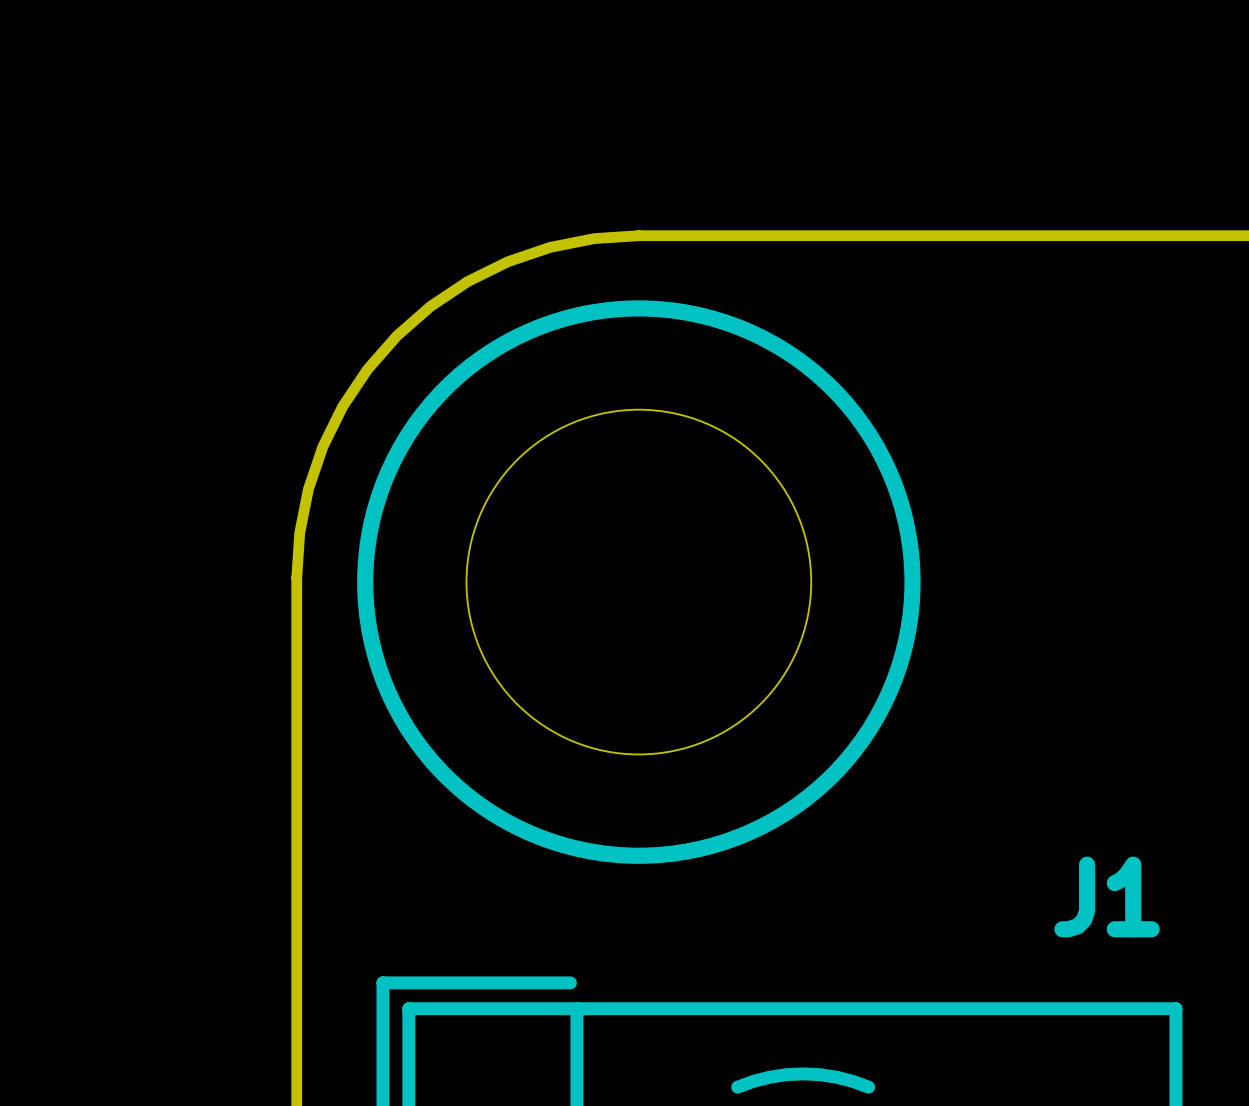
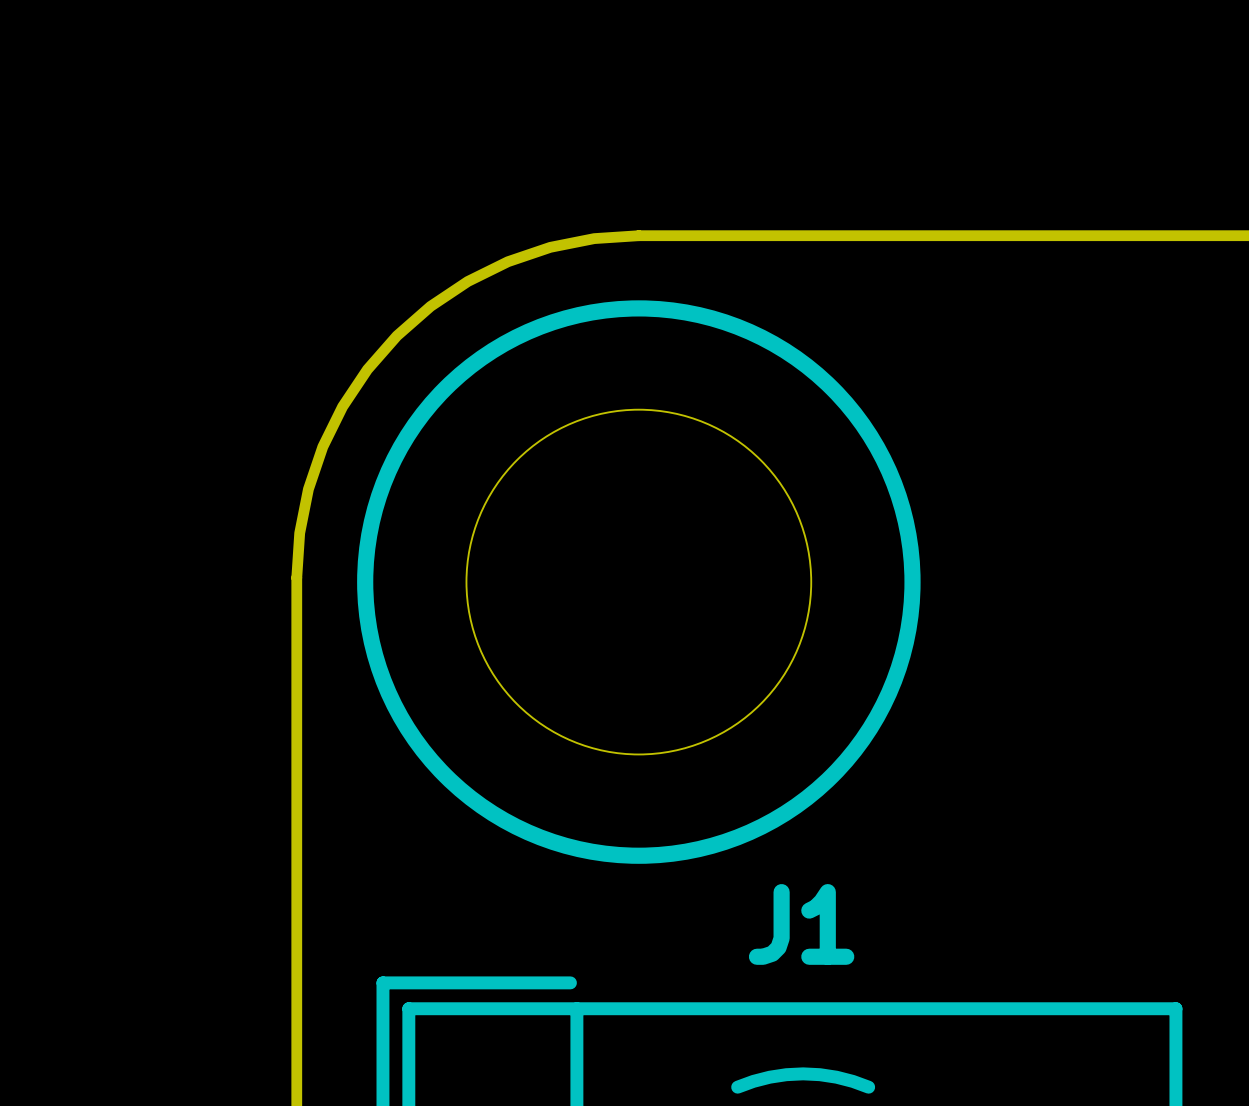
J1 name position: J1 (1107, 896) -> J1 (801, 924)

